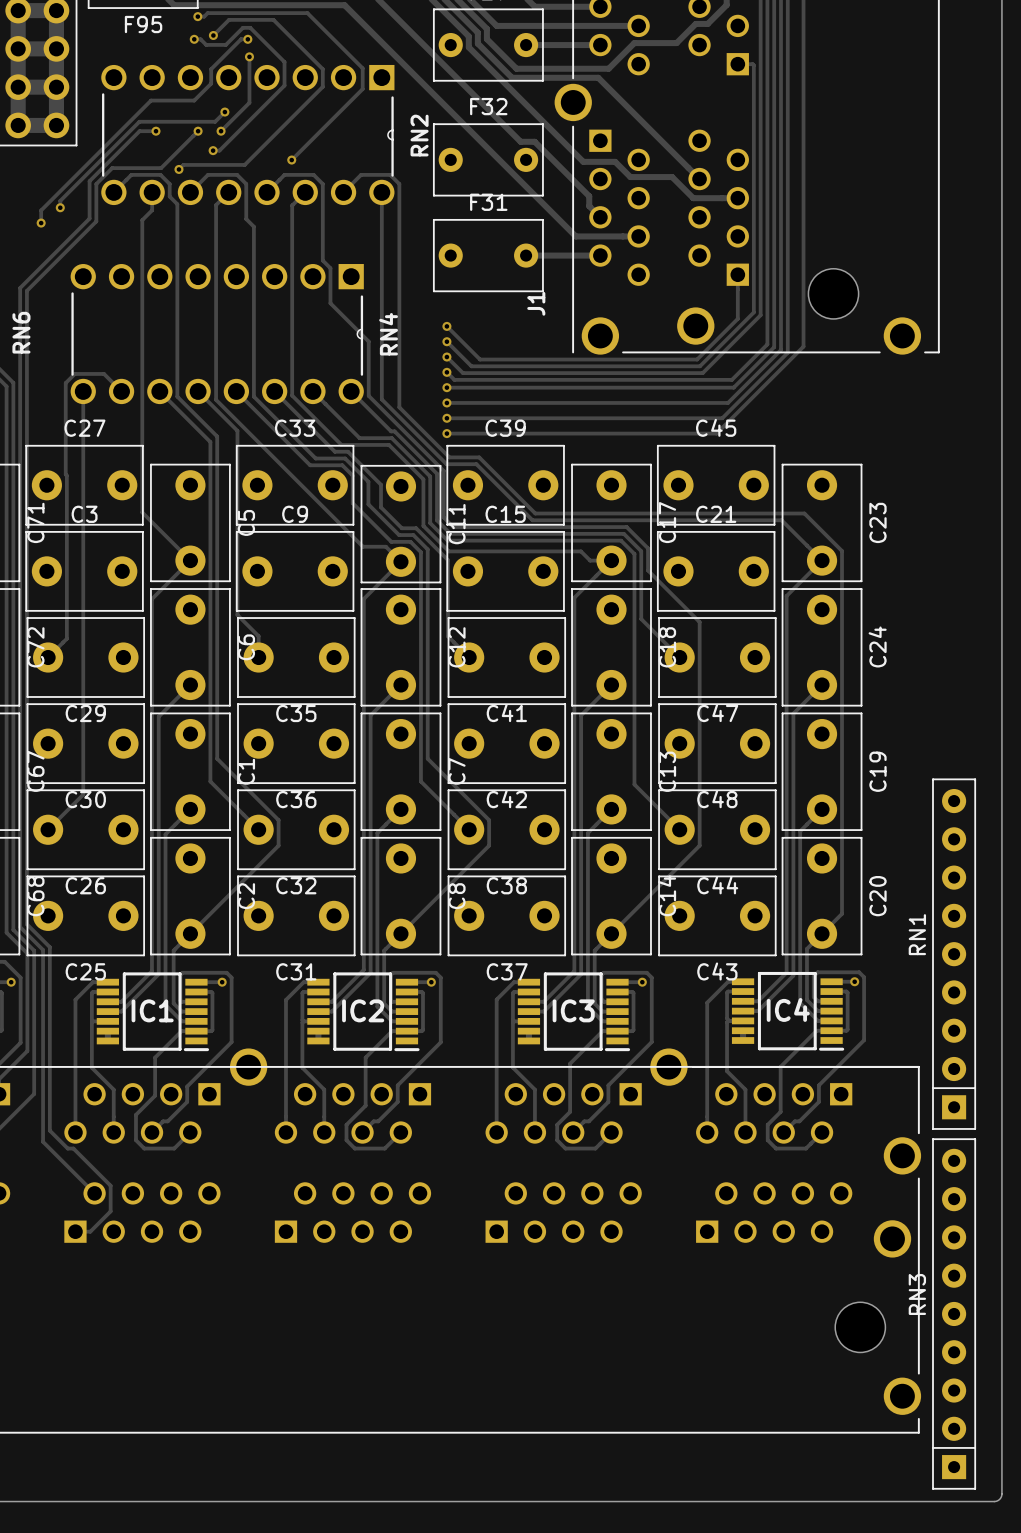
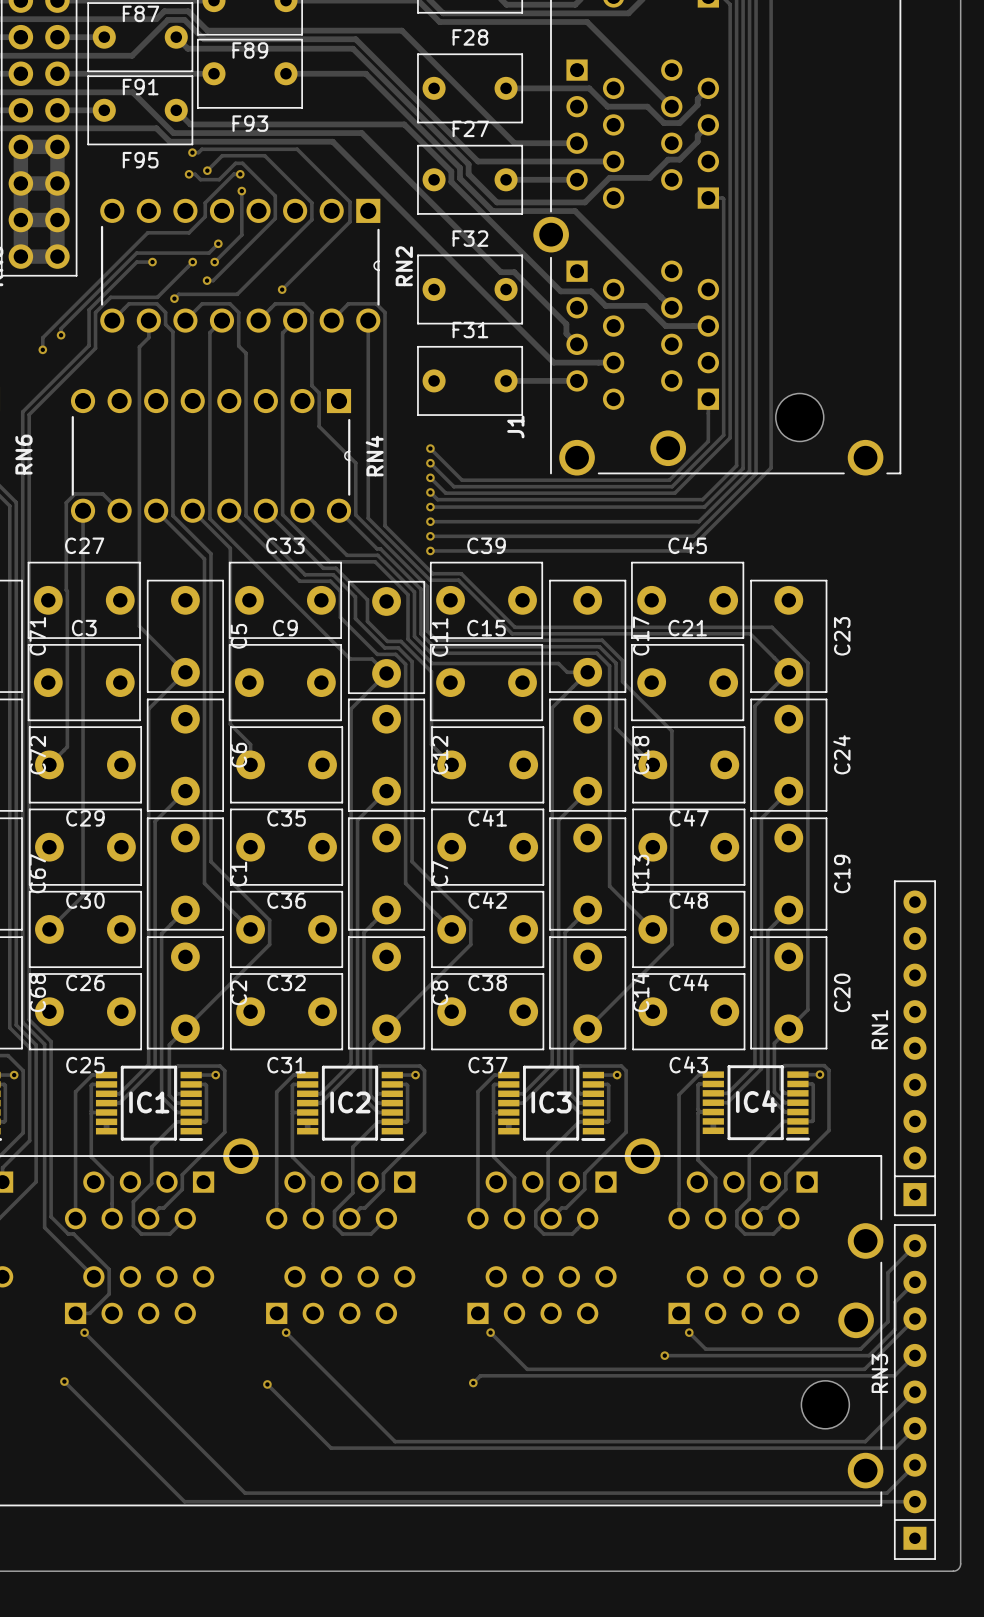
track: none -> (914, 1245) (887, 1272) (887, 1321) (860, 1349) (705, 1349) (689, 1332)
track: none -> (914, 1282) (895, 1302) (895, 1329) (869, 1355) (664, 1355)
track: none -> (914, 1318) (864, 1369) (527, 1369) (490, 1332)
track: none -> (84, 1332) (245, 1493) (887, 1493) (914, 1465)
via: none -> (84, 1332)
track: none -> (286, 1332) (395, 1441) (865, 1441) (914, 1392)
via: none -> (286, 1332)
via: none -> (490, 1332)
via: none -> (689, 1332)
via: none -> (664, 1355)
track: none -> (914, 1355) (894, 1375) (480, 1375) (473, 1383)
track: none -> (64, 1381) (184, 1501) (914, 1501)
via: none -> (64, 1381)
via: none -> (473, 1383)
track: none -> (267, 1384) (331, 1448) (895, 1448) (914, 1428)
via: none -> (267, 1384)

